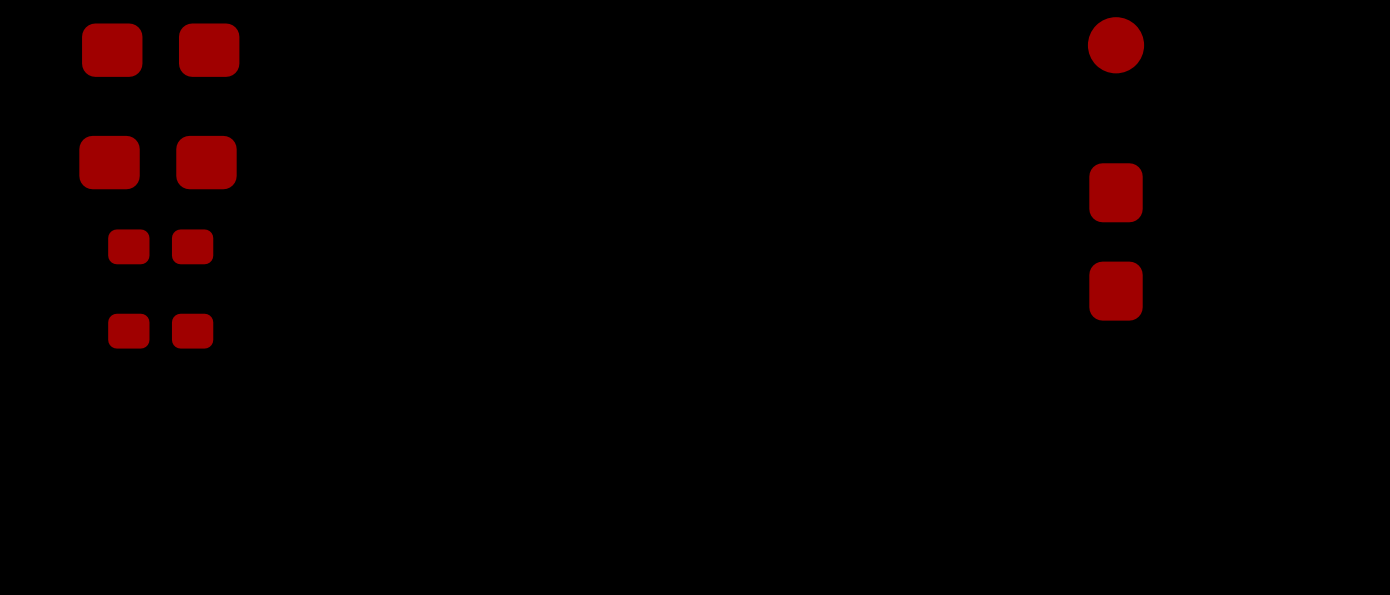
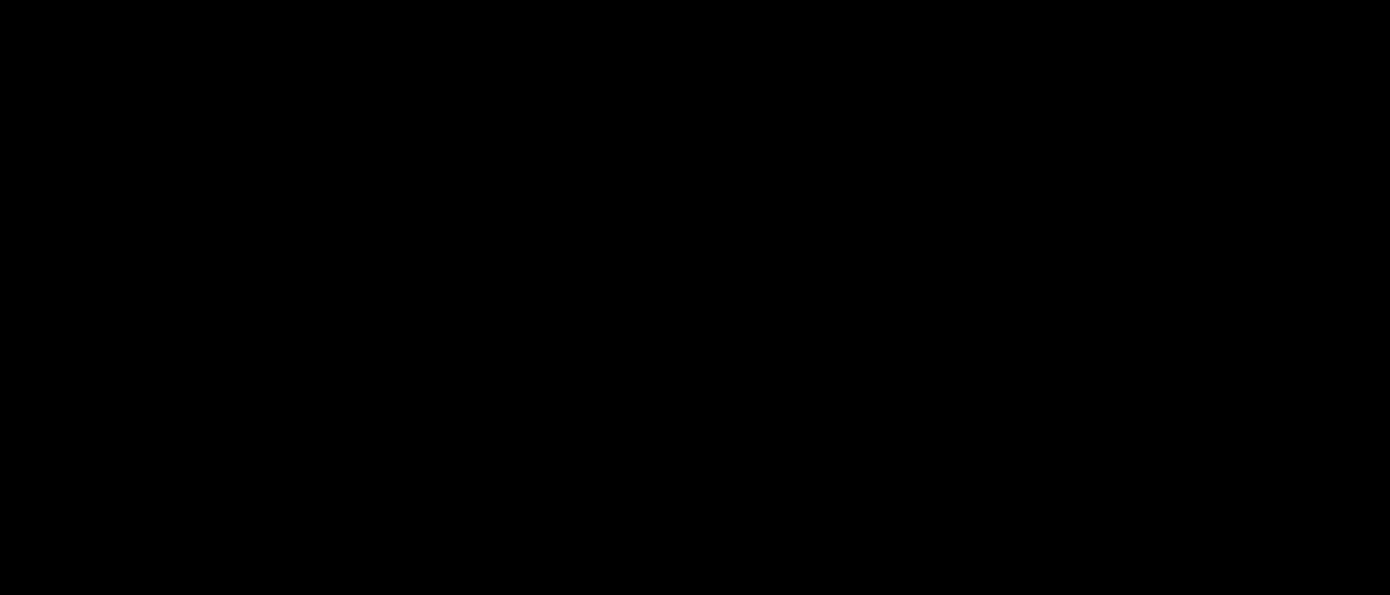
part: (1116, 45) -> none
part: (160, 50) -> none
part: (158, 162) -> none
part: (1116, 241) -> none
part: (160, 246) -> none
part: (160, 331) -> none

